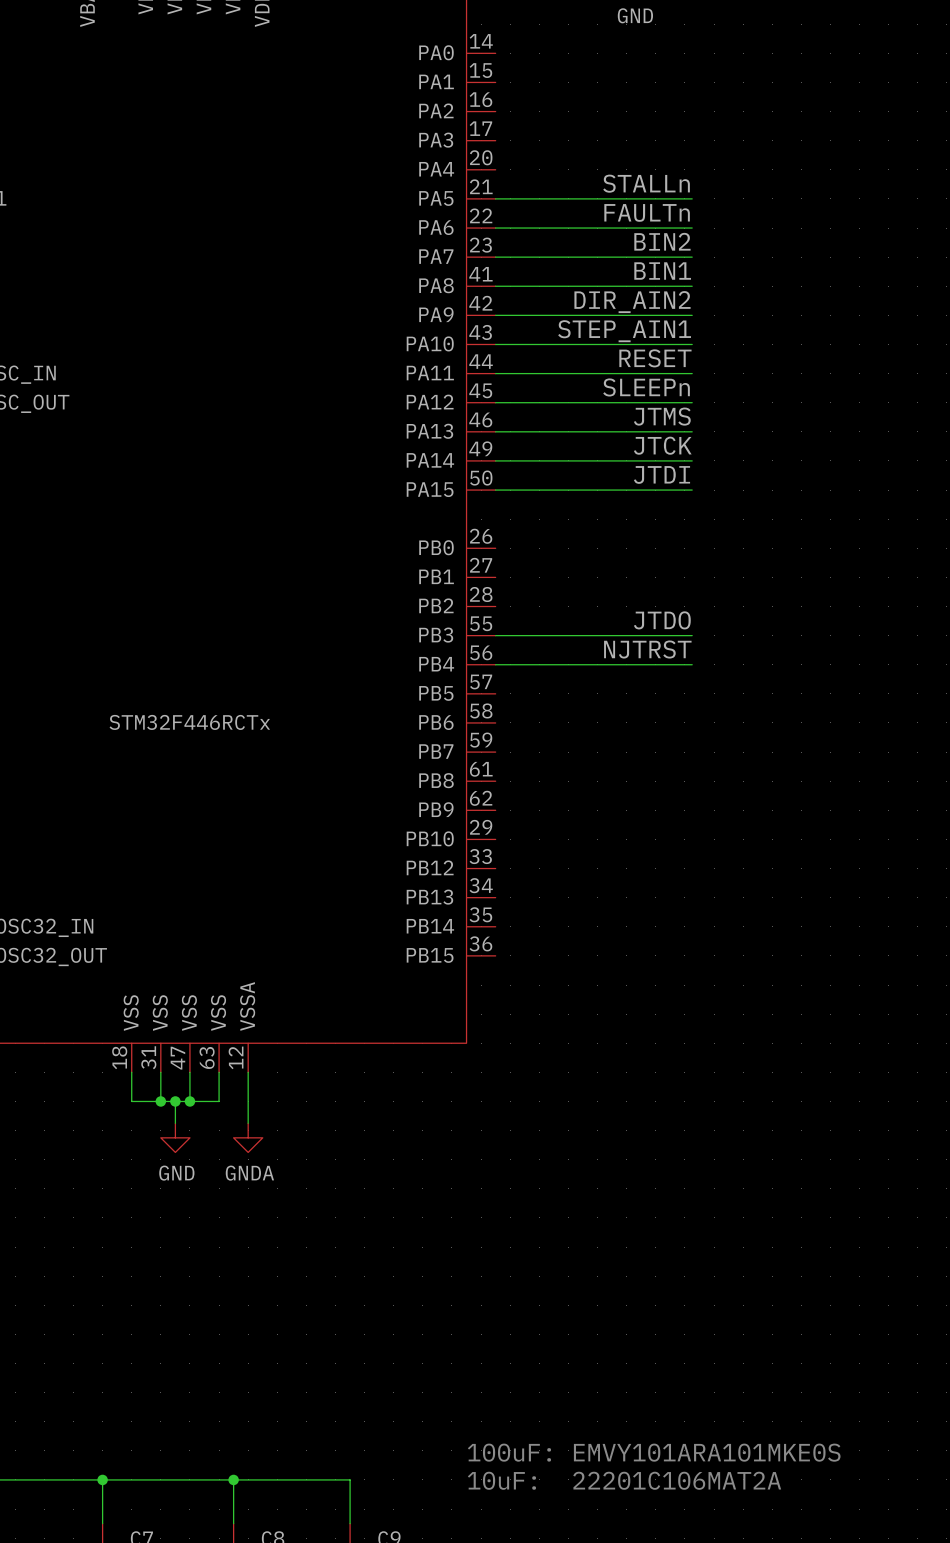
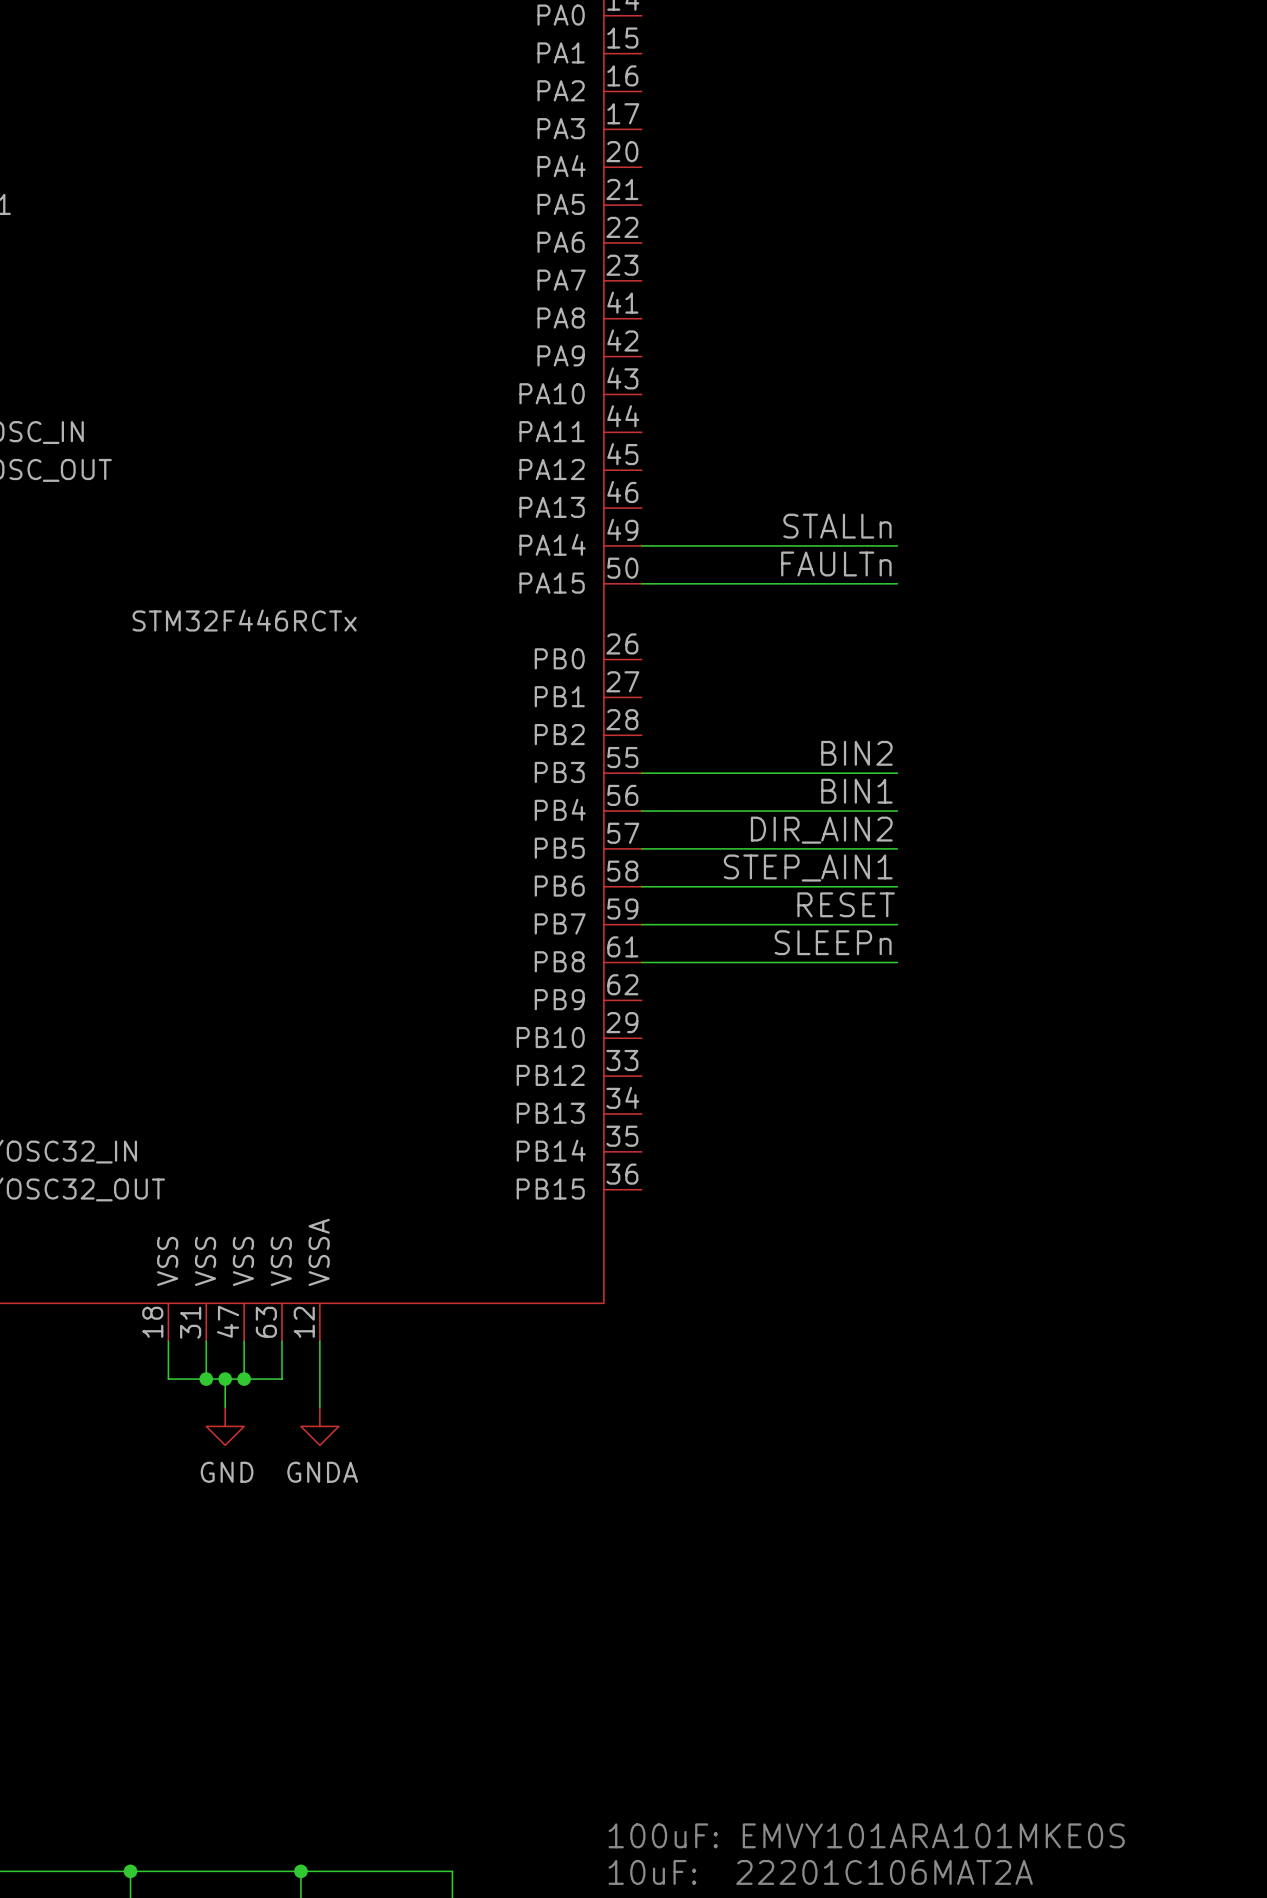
label: STALLn (646, 183) -> none
wire: (495, 198) (692, 198) -> none
label: FAULTn (647, 212) -> none
wire: (495, 228) (692, 228) -> none
label: BIN2 (662, 241) -> none
wire: (495, 257) (692, 257) -> none
label: BIN1 (662, 271) -> none
wire: (495, 286) (692, 286) -> none
label: DIR_AIN2 (632, 302) -> none
wire: (495, 315) (692, 315) -> none
label: STEP_AIN1 (624, 331) -> none
wire: (495, 344) (692, 344) -> none
label: RESET (655, 358) -> none
wire: (495, 373) (692, 373) -> none
label: SLEEPn (646, 387) -> none
wire: (495, 402) (692, 402) -> none
label: JTMS (662, 416) -> none
wire: (495, 431) (692, 431) -> (641, 848) (897, 848)
label: JTCK (662, 445) -> STALLn (837, 526)
label: JTDI (662, 474) -> FAULTn (836, 563)
label: JTDO (662, 620) -> BIN2 (856, 753)
label: NJTRST (647, 649) -> BIN1 (856, 791)
label: none -> DIR_AIN2 (821, 830)
label: none -> STEP_AIN1 (808, 868)
part value position: STM32F446RCTx (189, 722) -> STM32F446RCTx (244, 620)
wire: none -> (641, 886) (897, 886)
label: none -> RESET (846, 904)
wire: none -> (641, 924) (897, 924)
label: none -> SLEEPn (833, 942)
wire: none -> (641, 962) (897, 962)

